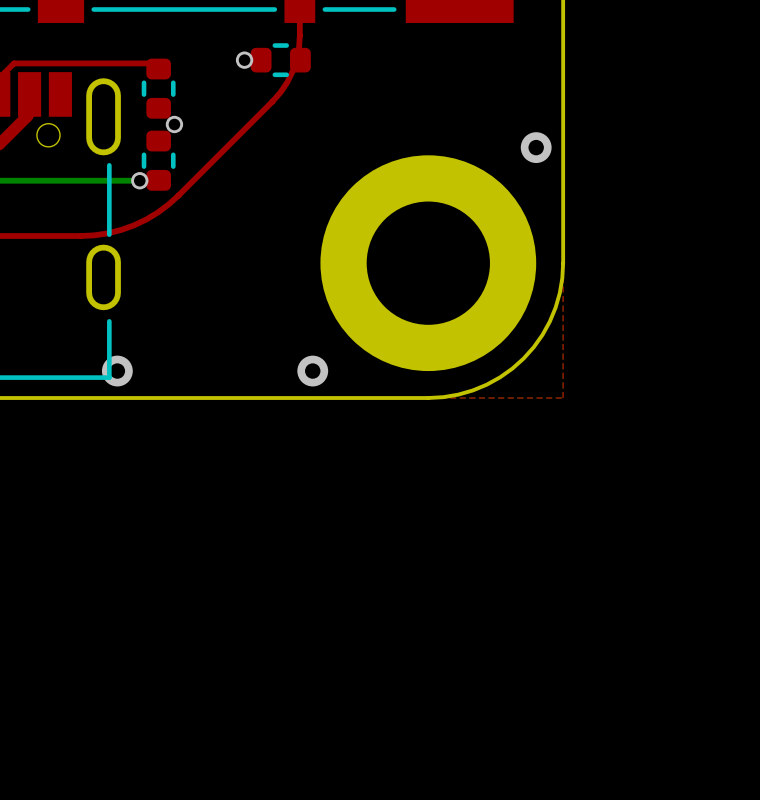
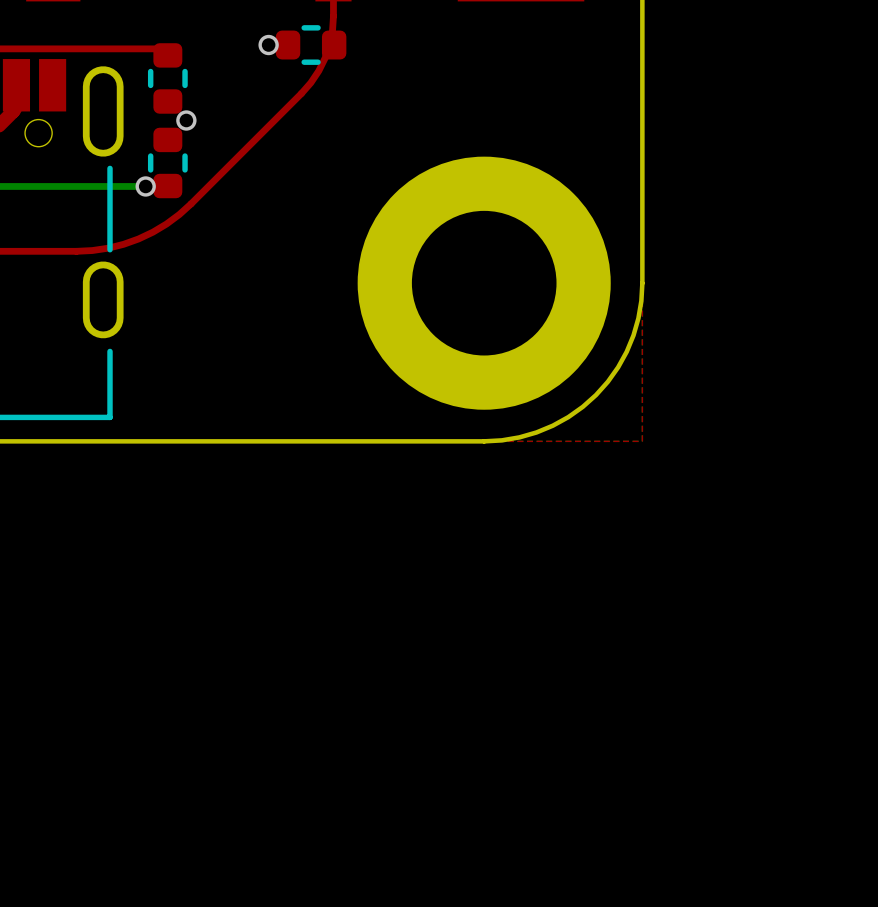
via: (536, 147) -> none
via: (117, 371) -> none
via: (312, 371) -> none

